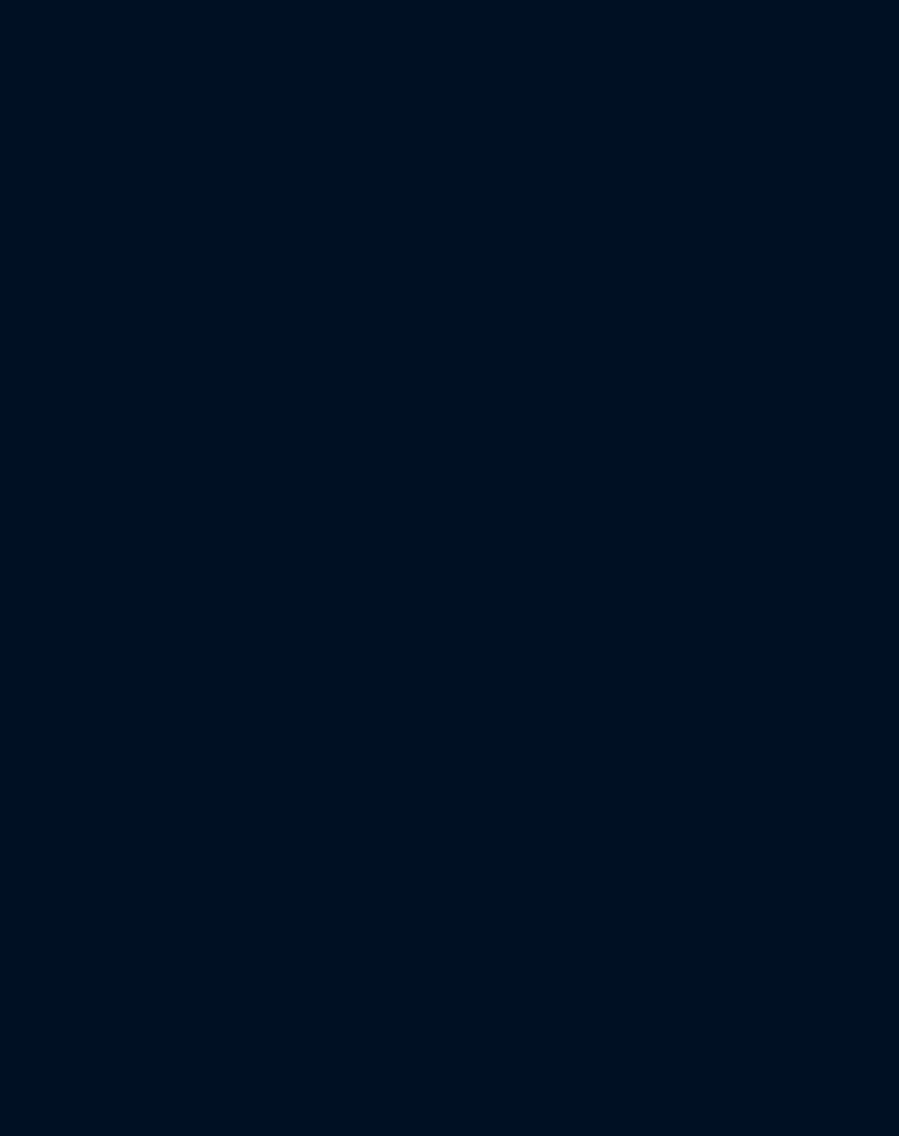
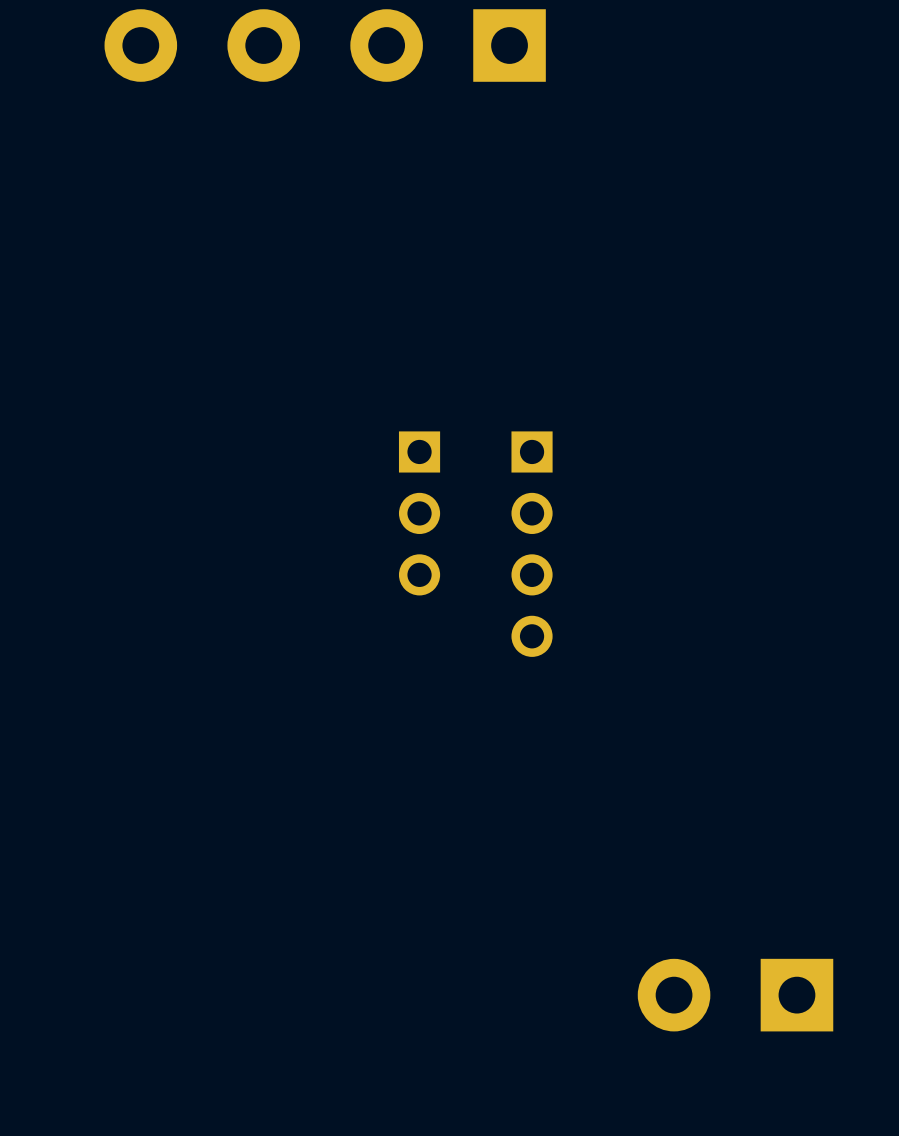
part: none -> (325, 45)
part: none -> (419, 513)
part: none -> (532, 544)
part: none -> (735, 995)

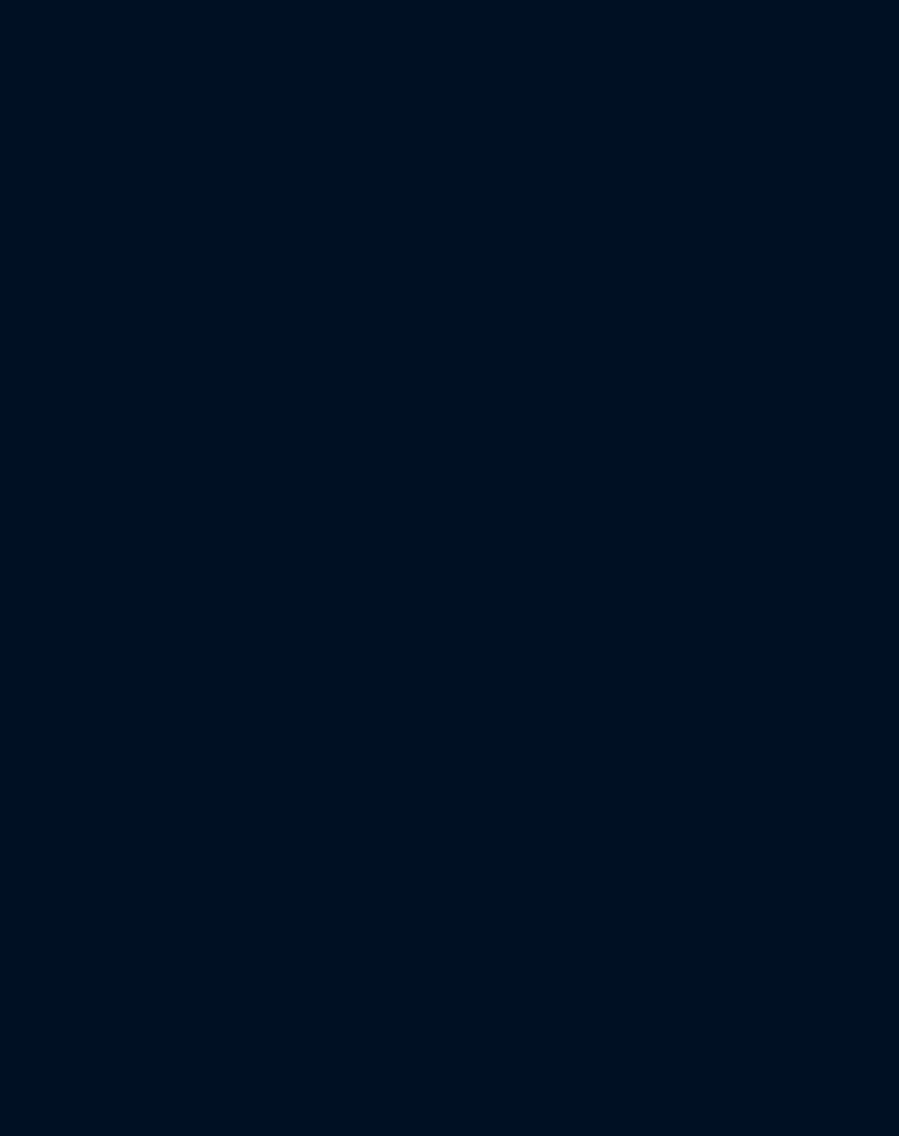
part: (325, 45) -> none
part: (419, 513) -> none
part: (532, 544) -> none
part: (735, 995) -> none

